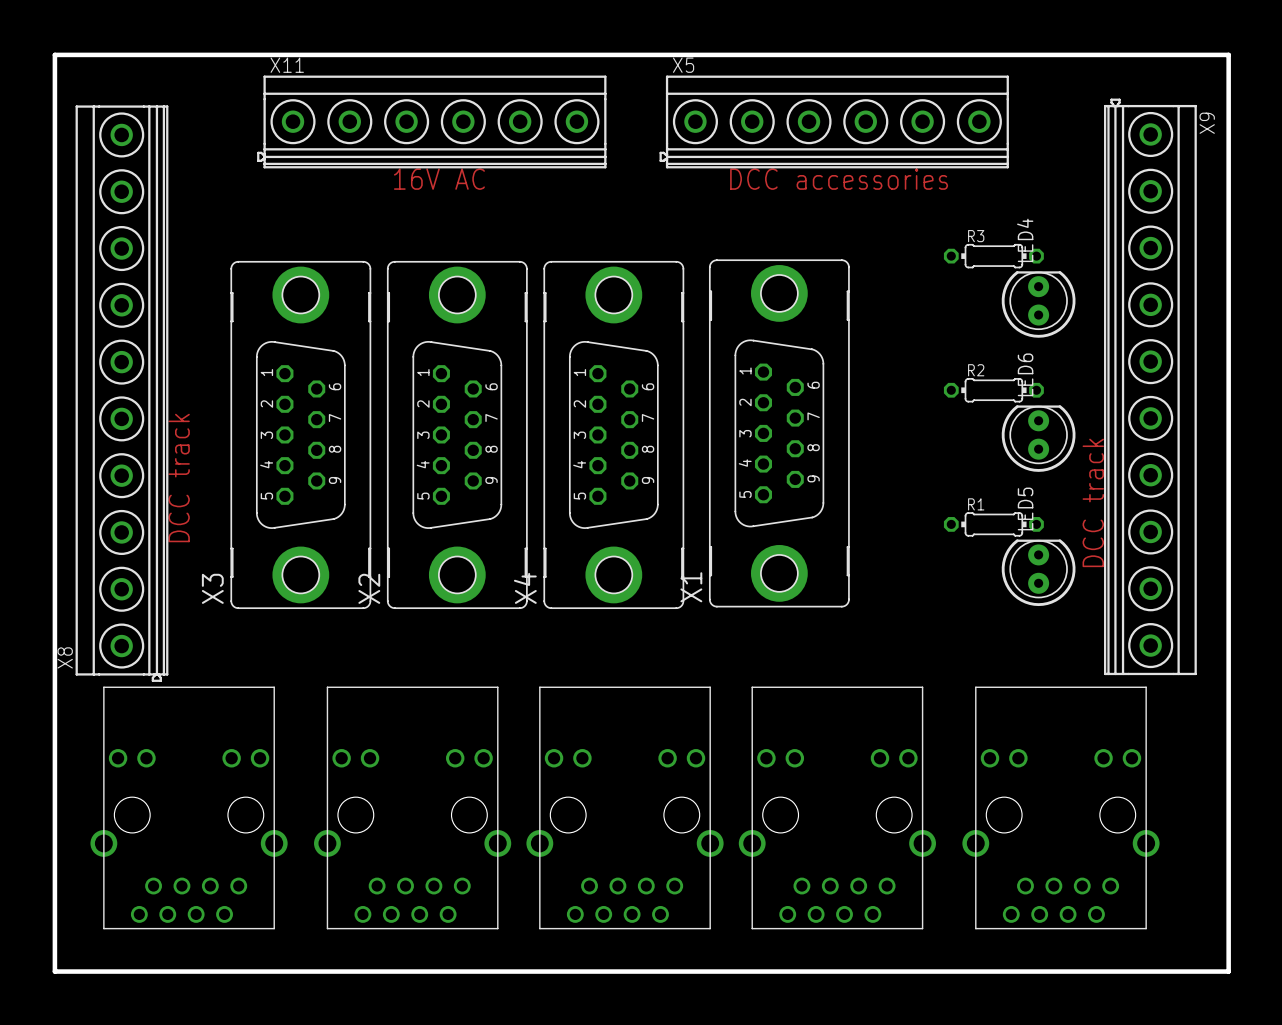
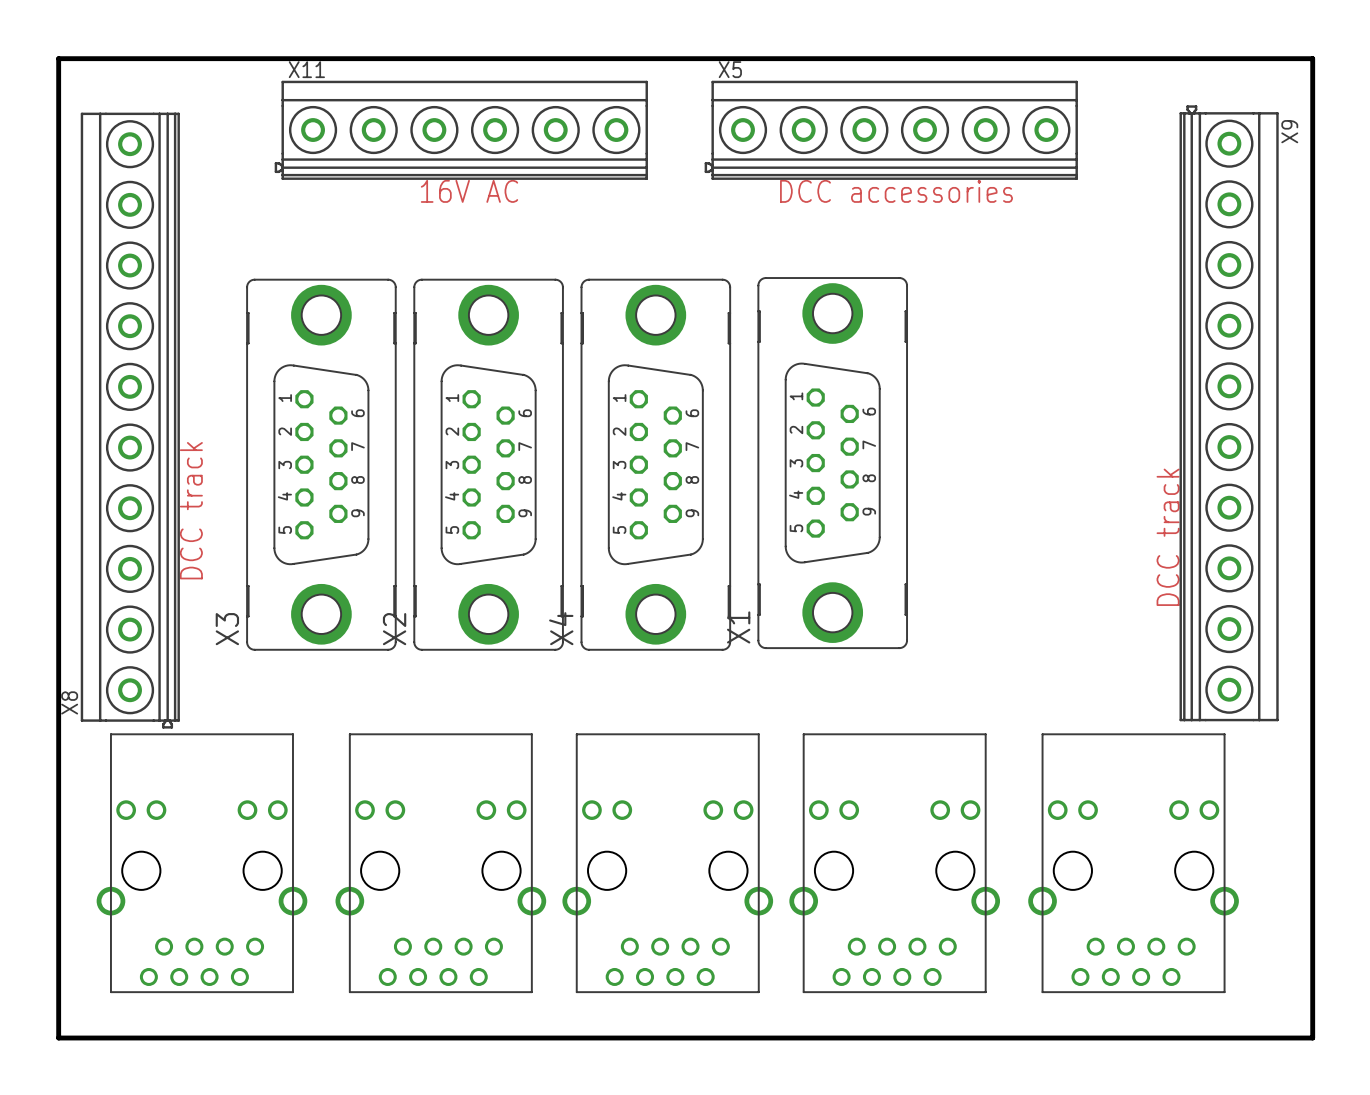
R3: (993, 256) -> none
LED4: (1038, 304) -> none
R2: (993, 390) -> none
LED6: (1038, 438) -> none
R1: (993, 524) -> none
LED5: (1038, 572) -> none

